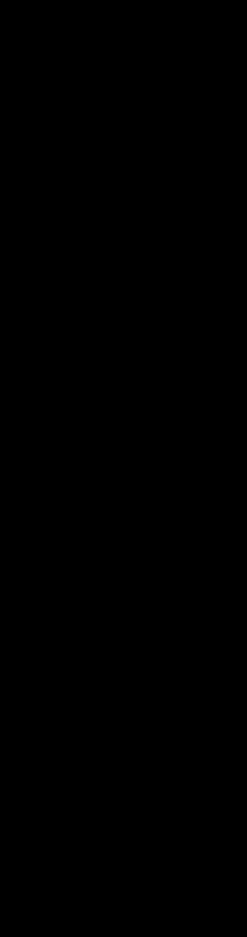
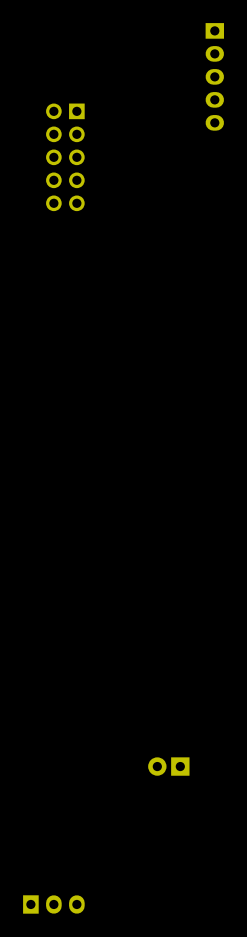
part: none -> (214, 76)
part: none -> (65, 157)
part: none -> (168, 766)
part: none -> (53, 904)

